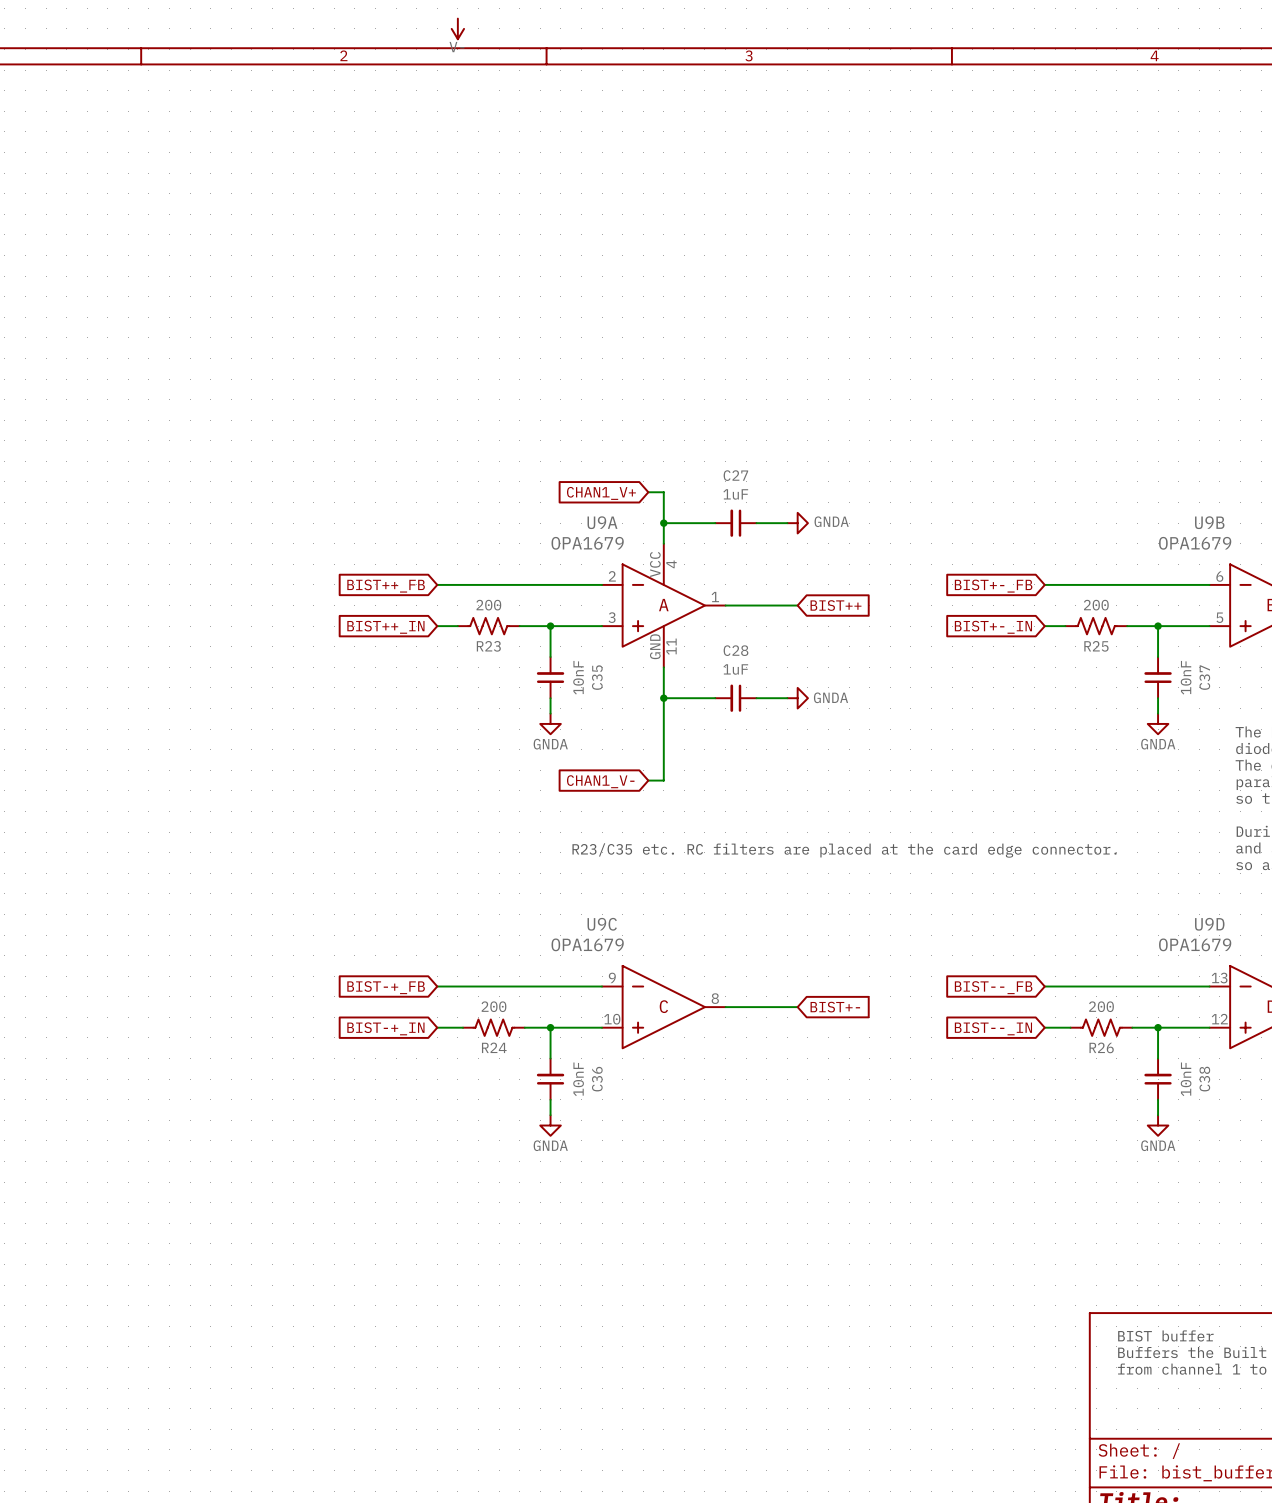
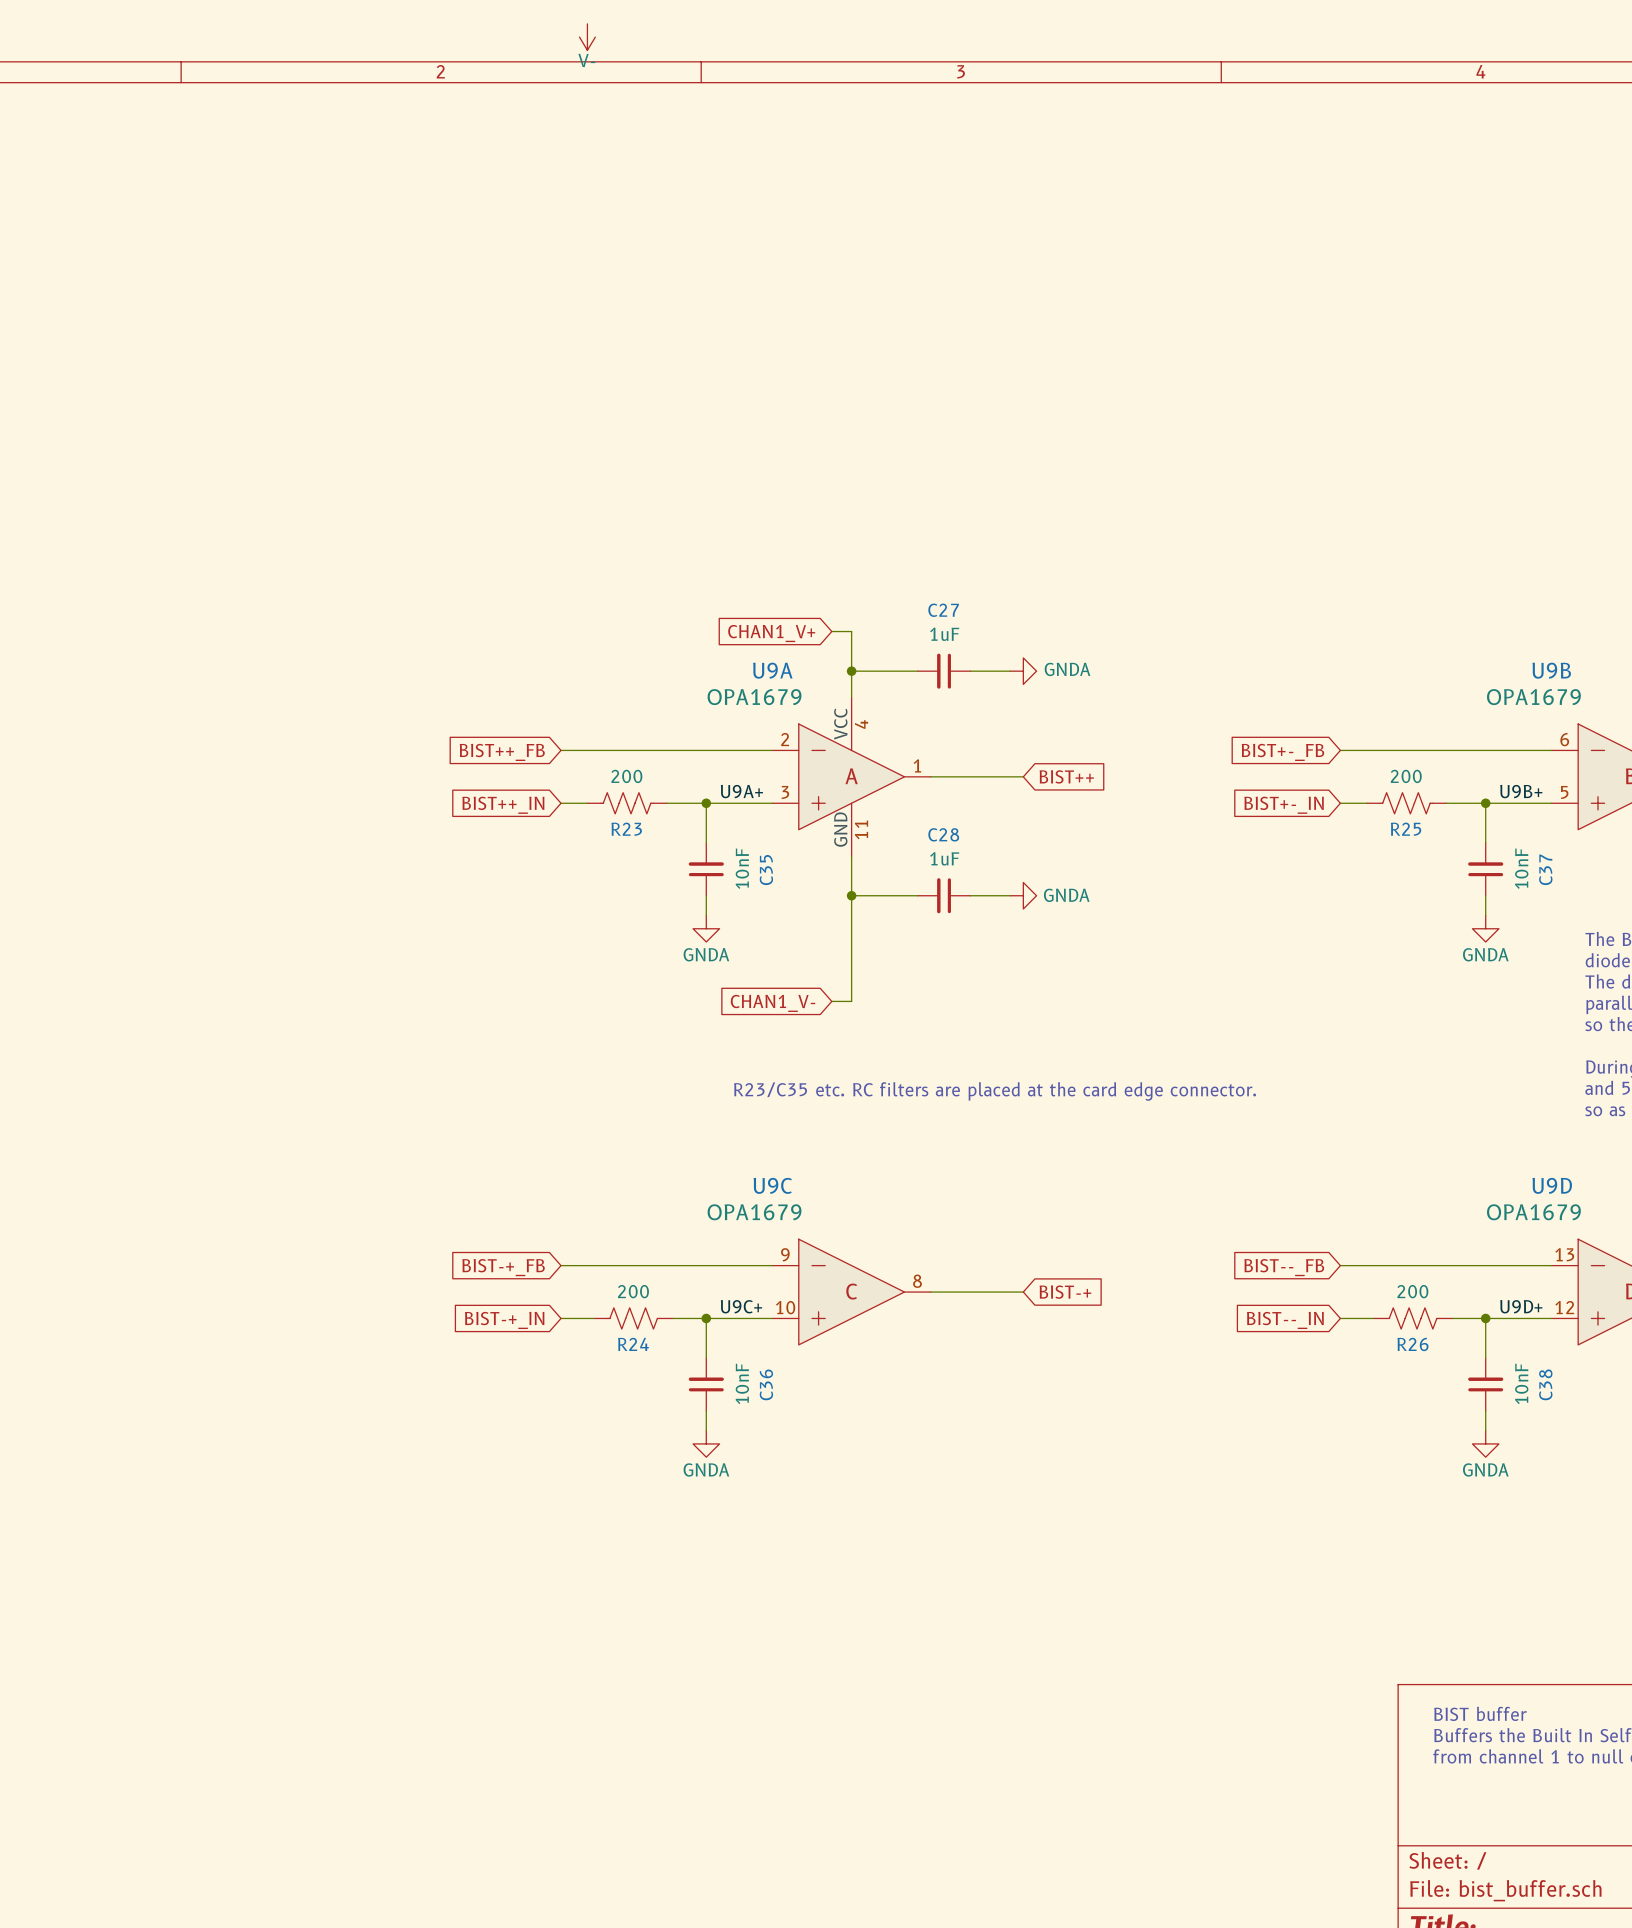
label: none -> U9A+ (741, 791)
label: none -> U9B+ (1521, 791)
global label: BIST+- (835, 1007) -> BIST-+ (1065, 1292)
label: none -> U9C+ (741, 1306)
label: none -> U9D+ (1521, 1306)

